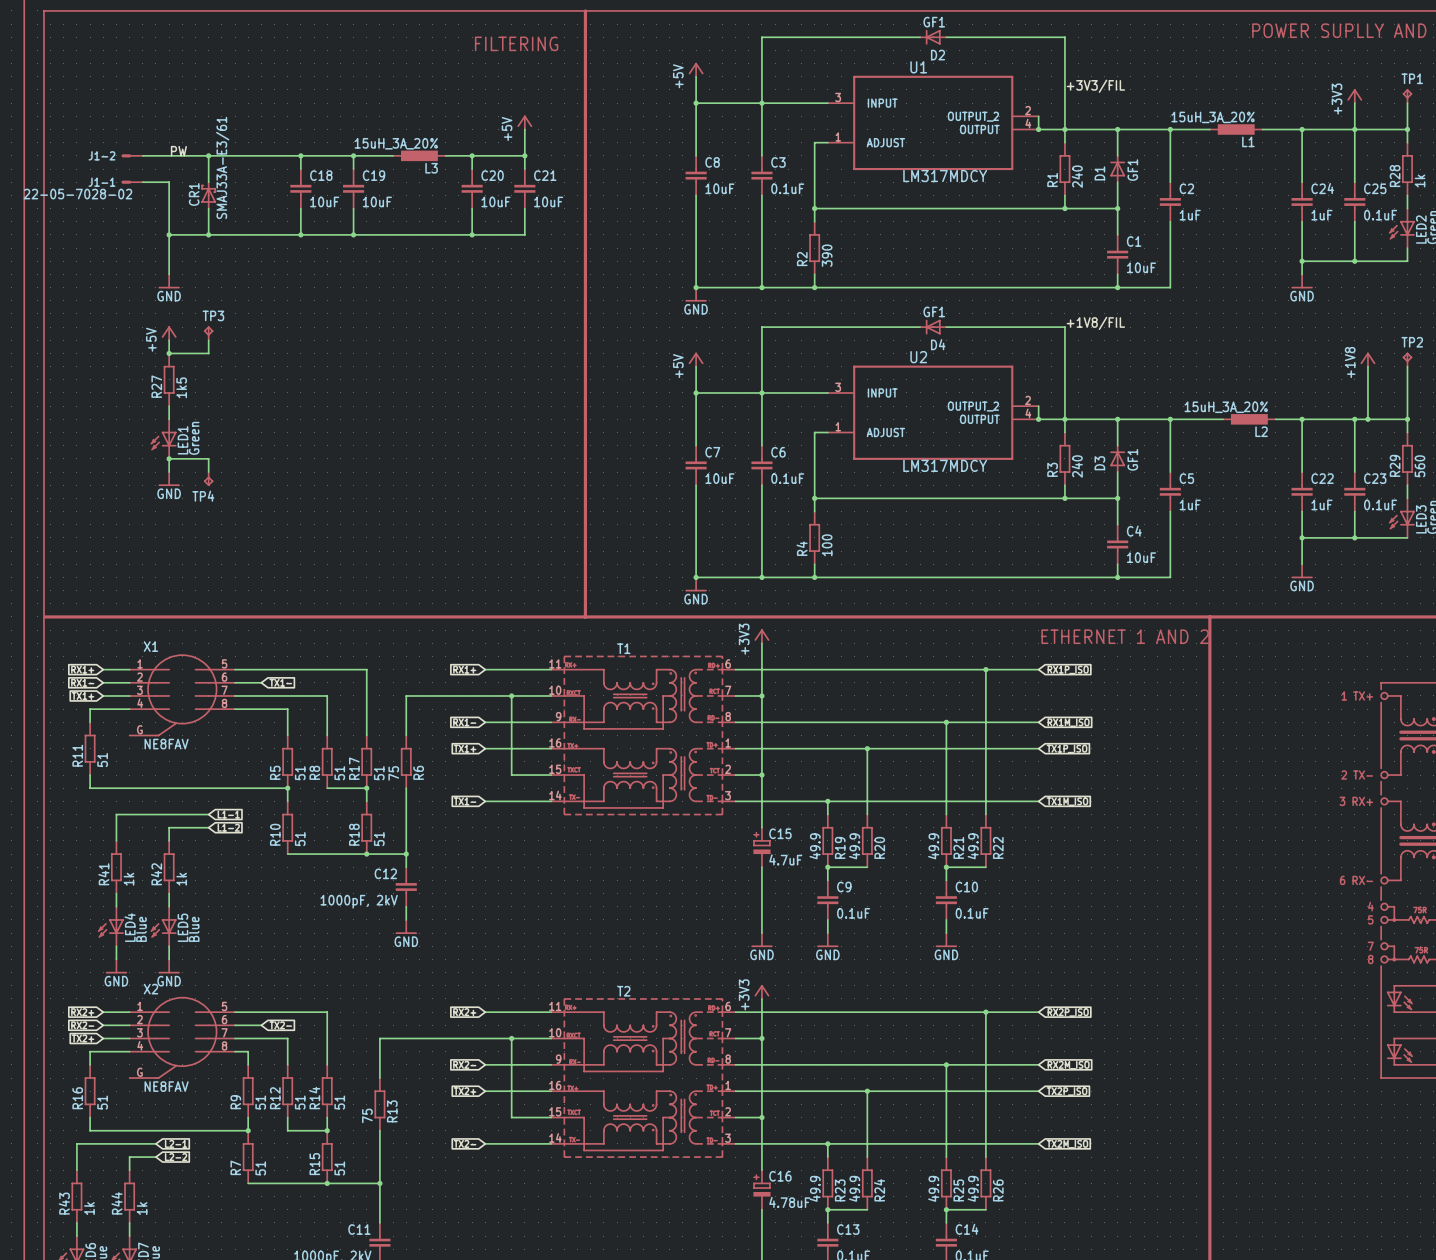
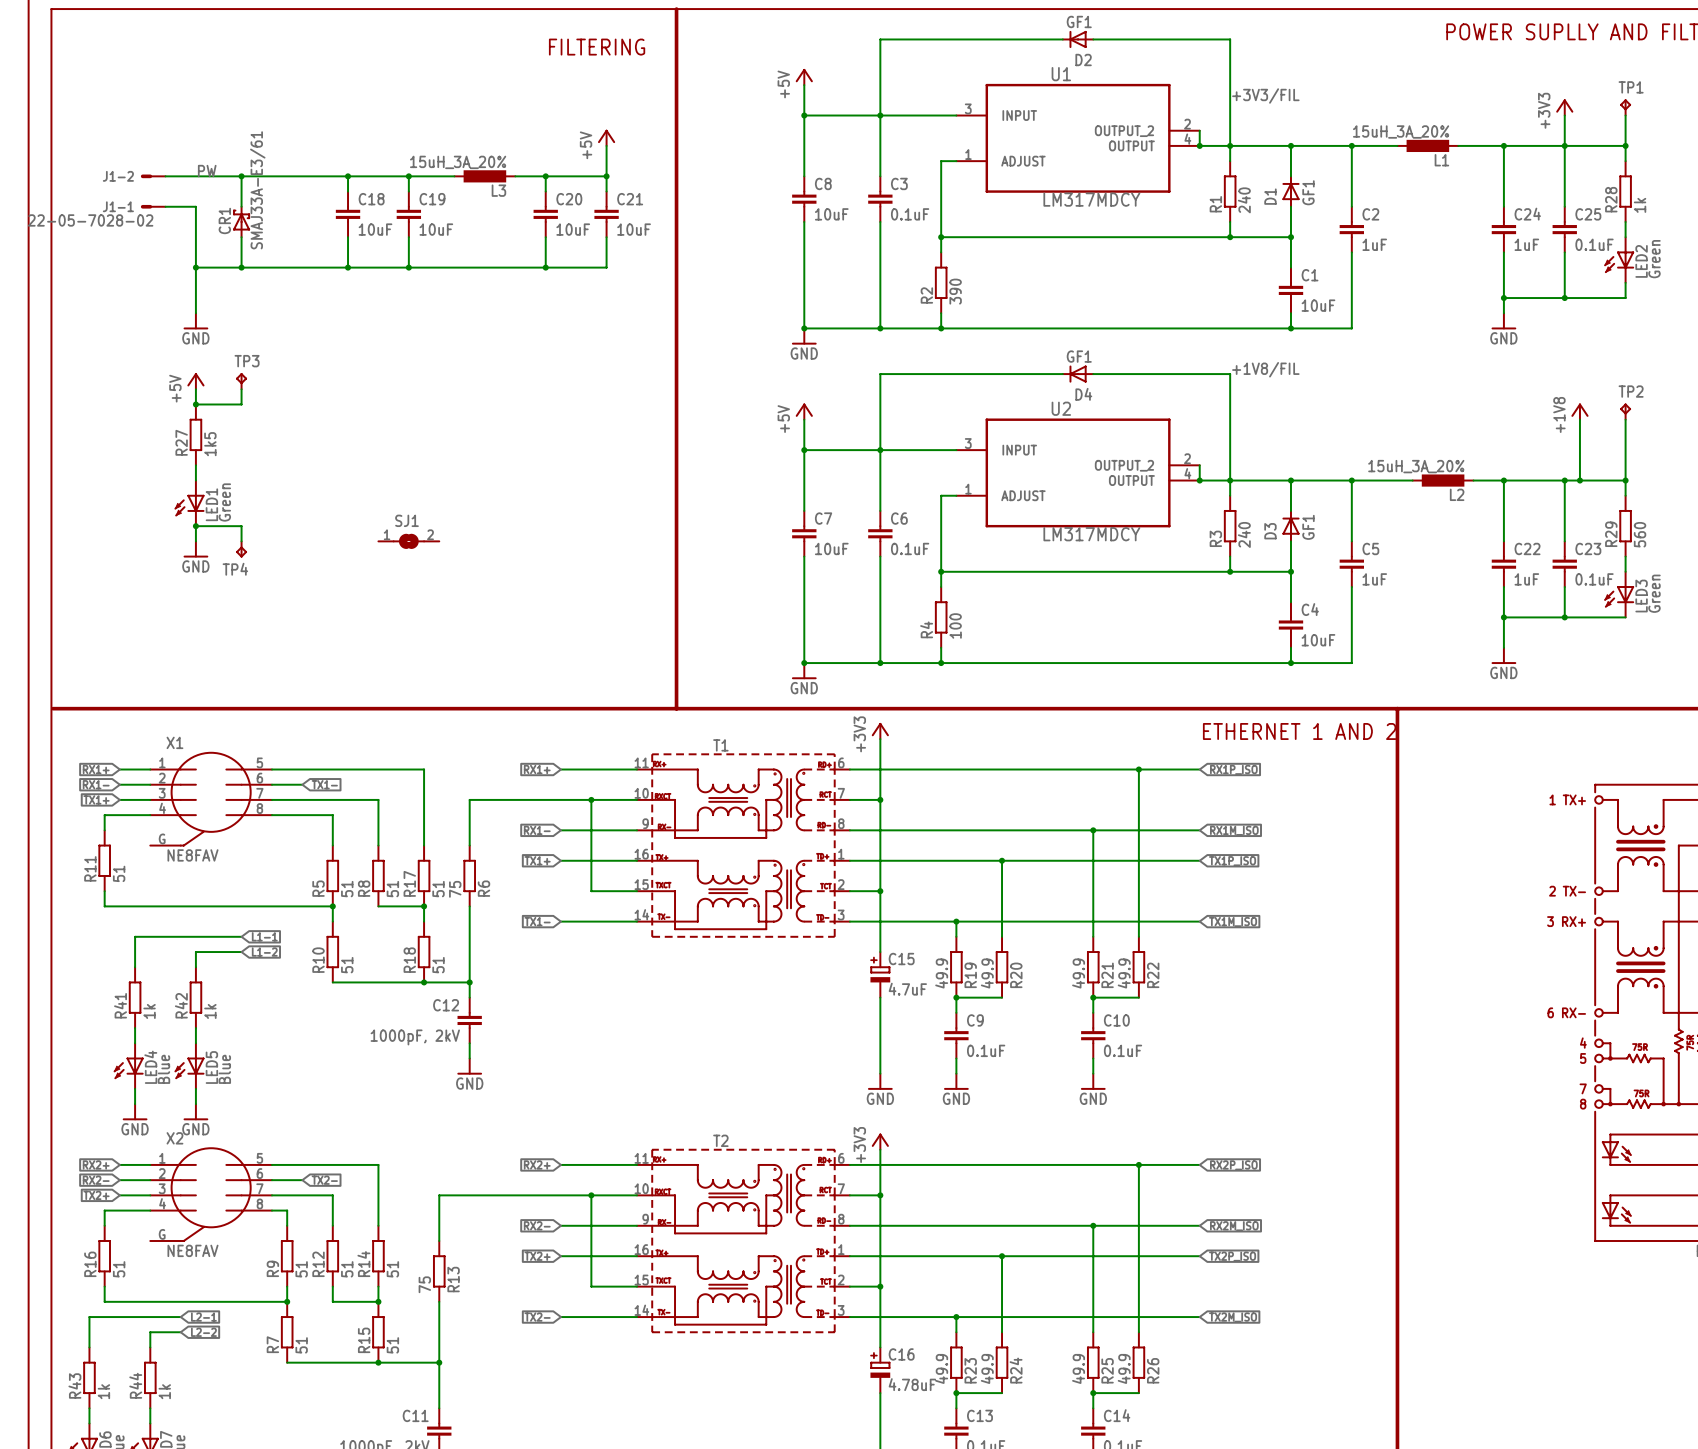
SJ1: none -> (408, 541)

